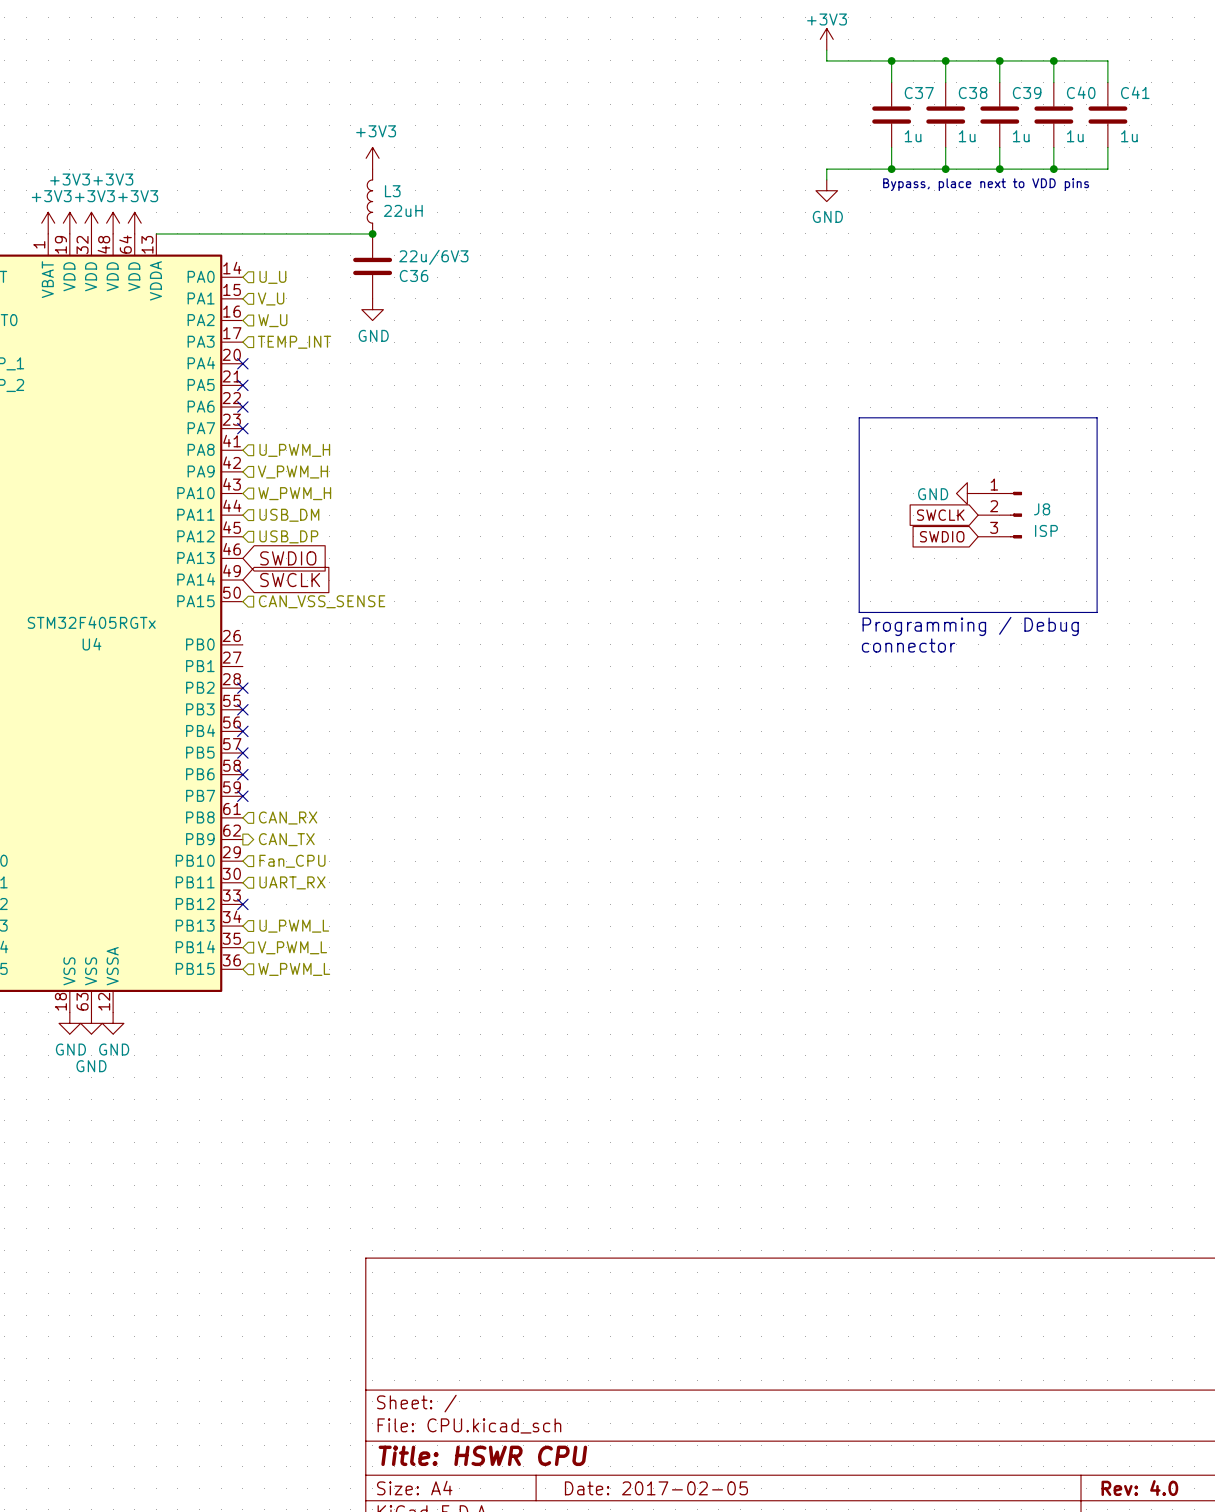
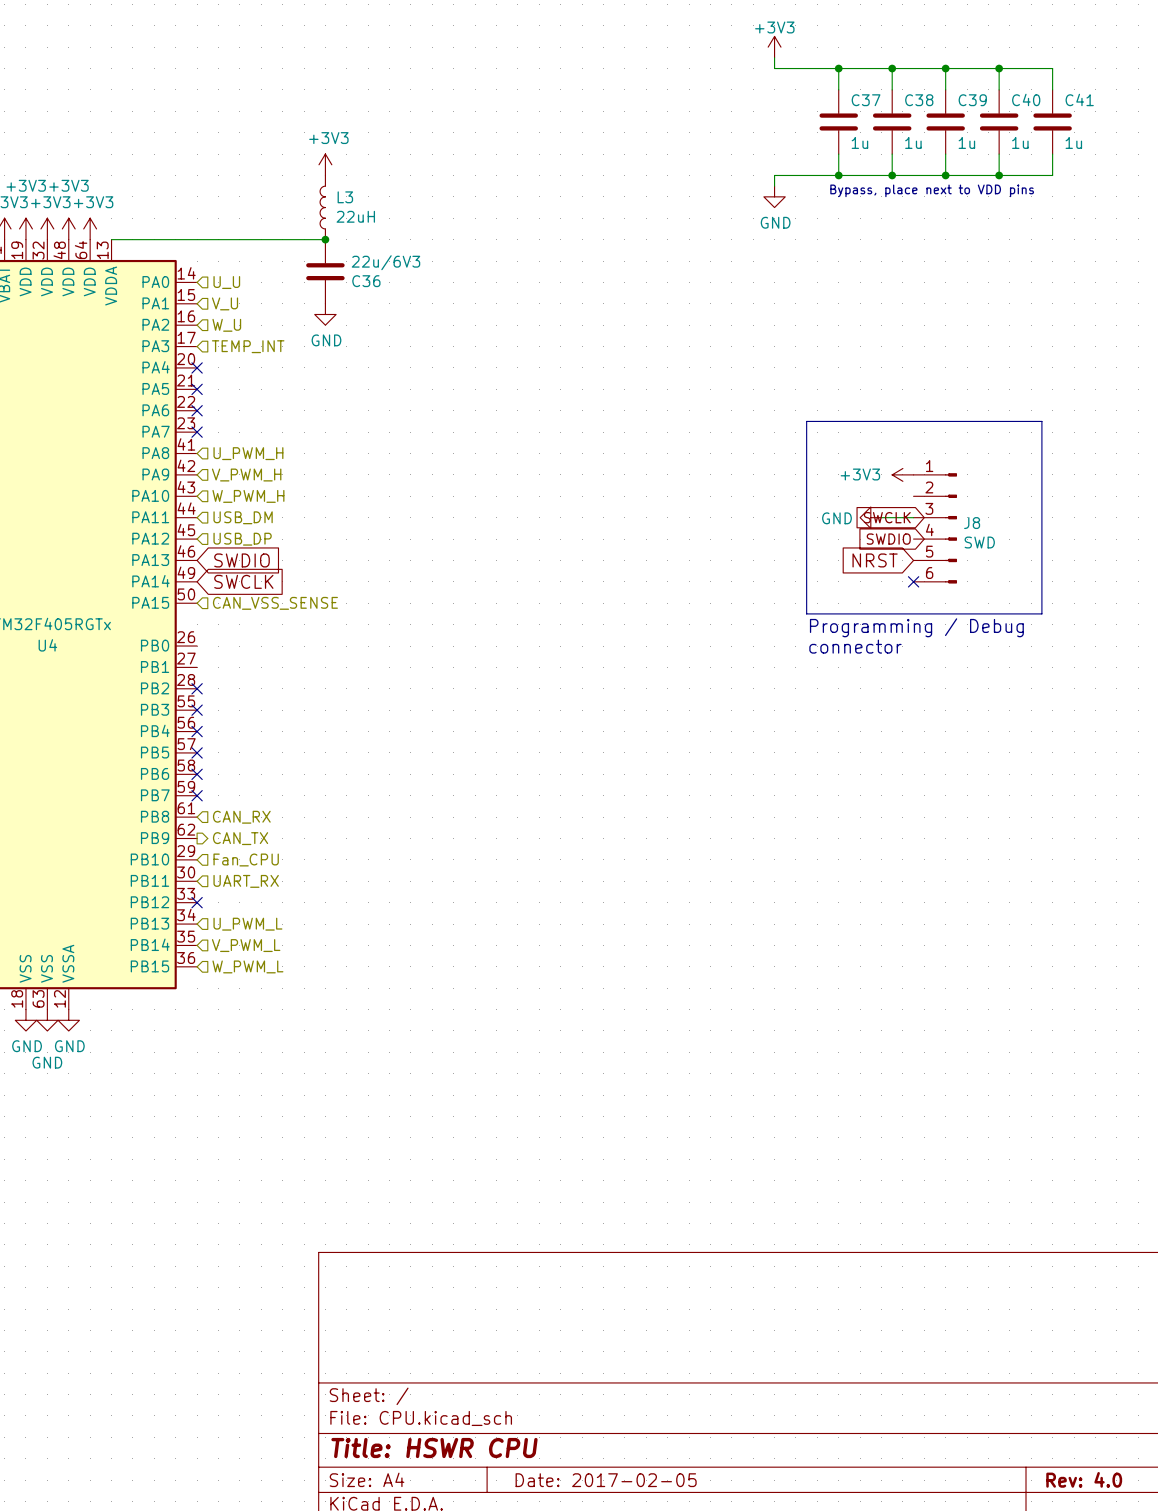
power symbol: none -> +3V3 (902, 474)
J8 symbol: [978, 491, 1023, 539] -> [913, 473, 958, 584]
power symbol position: GND (967, 493) -> GND (870, 517)
wire: none -> (881, 517) (913, 517)
J8 value: ISP (1046, 530) -> SWD (979, 542)
global label: none -> NRST (875, 560)
no-connect mark: none -> (913, 581)

